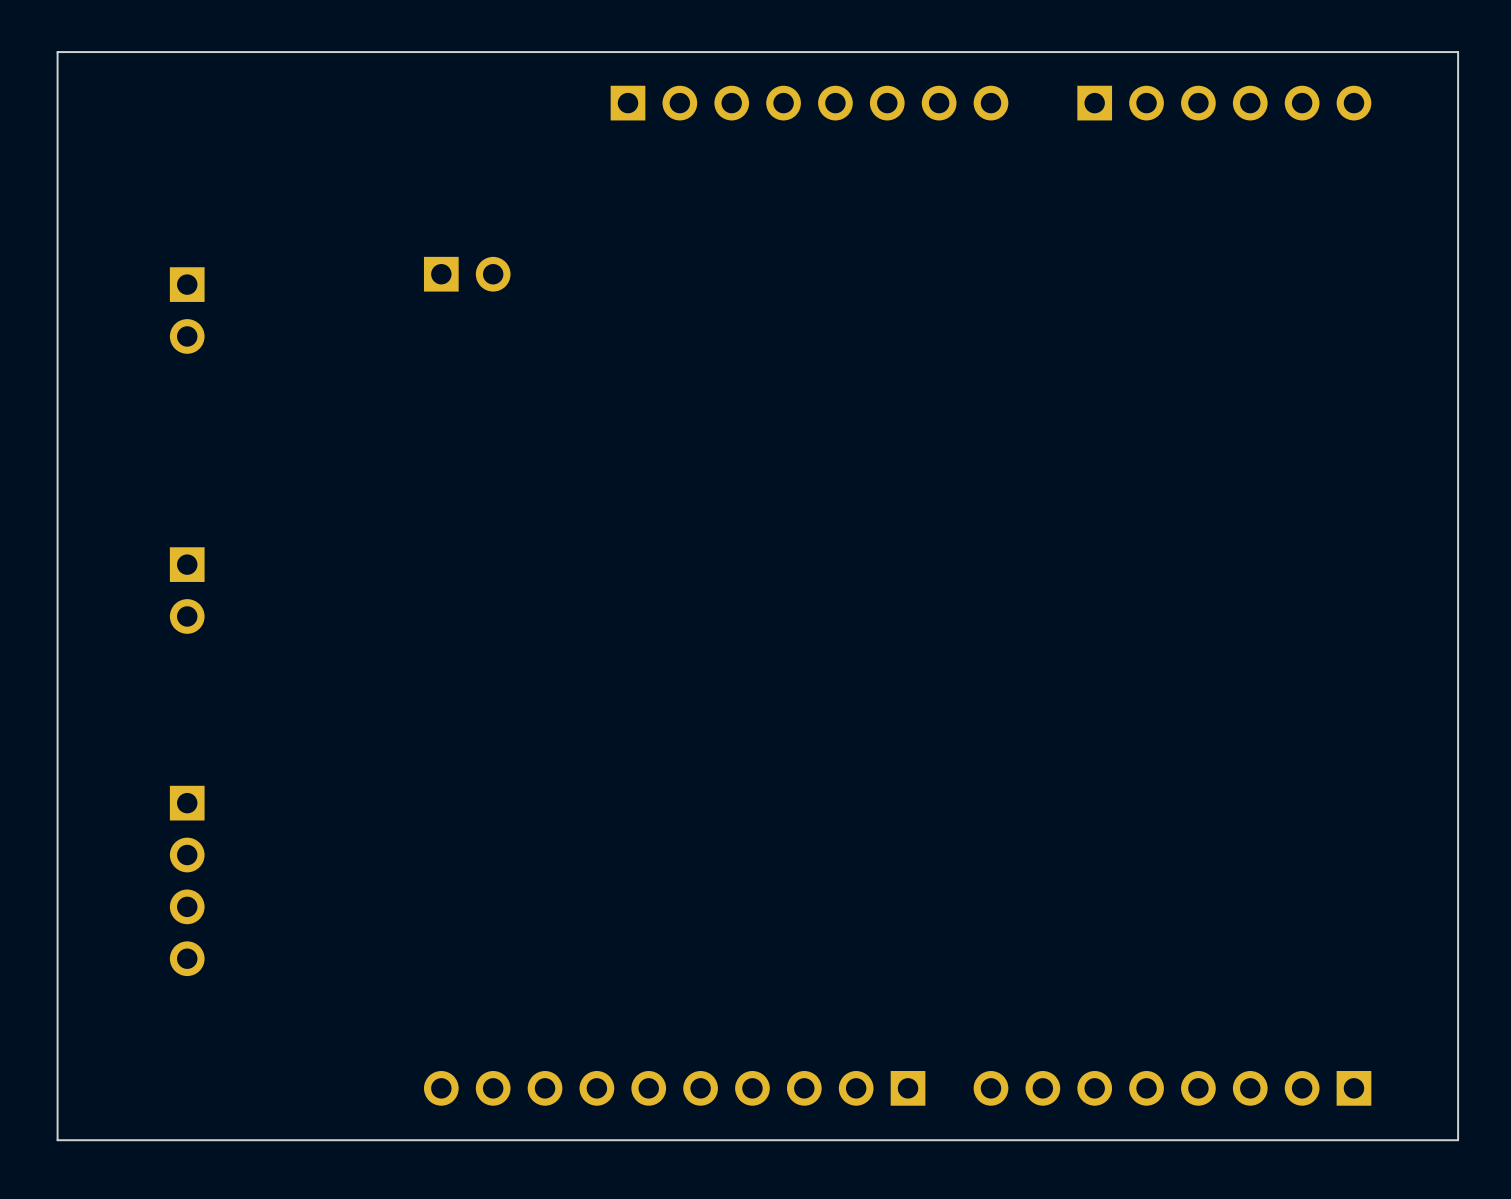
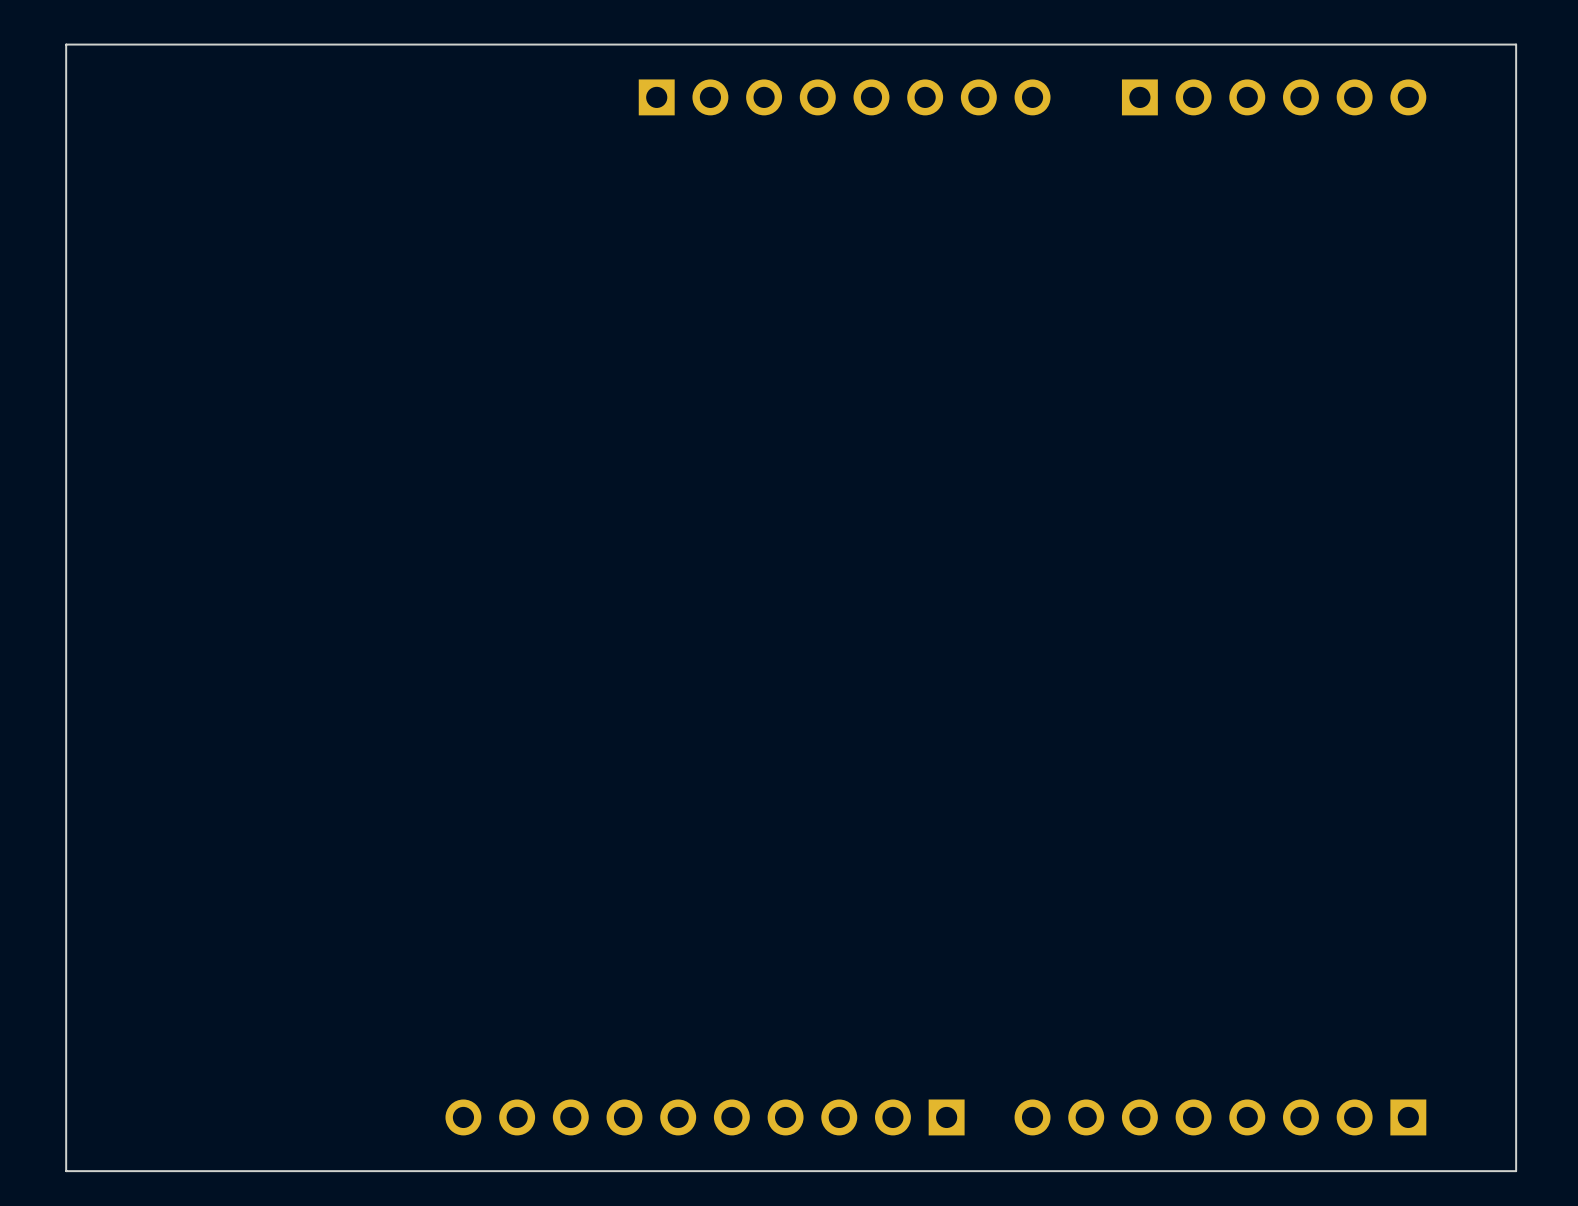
part: (467, 274) -> none
part: (187, 310) -> none
part: (187, 590) -> none
part: (187, 880) -> none

